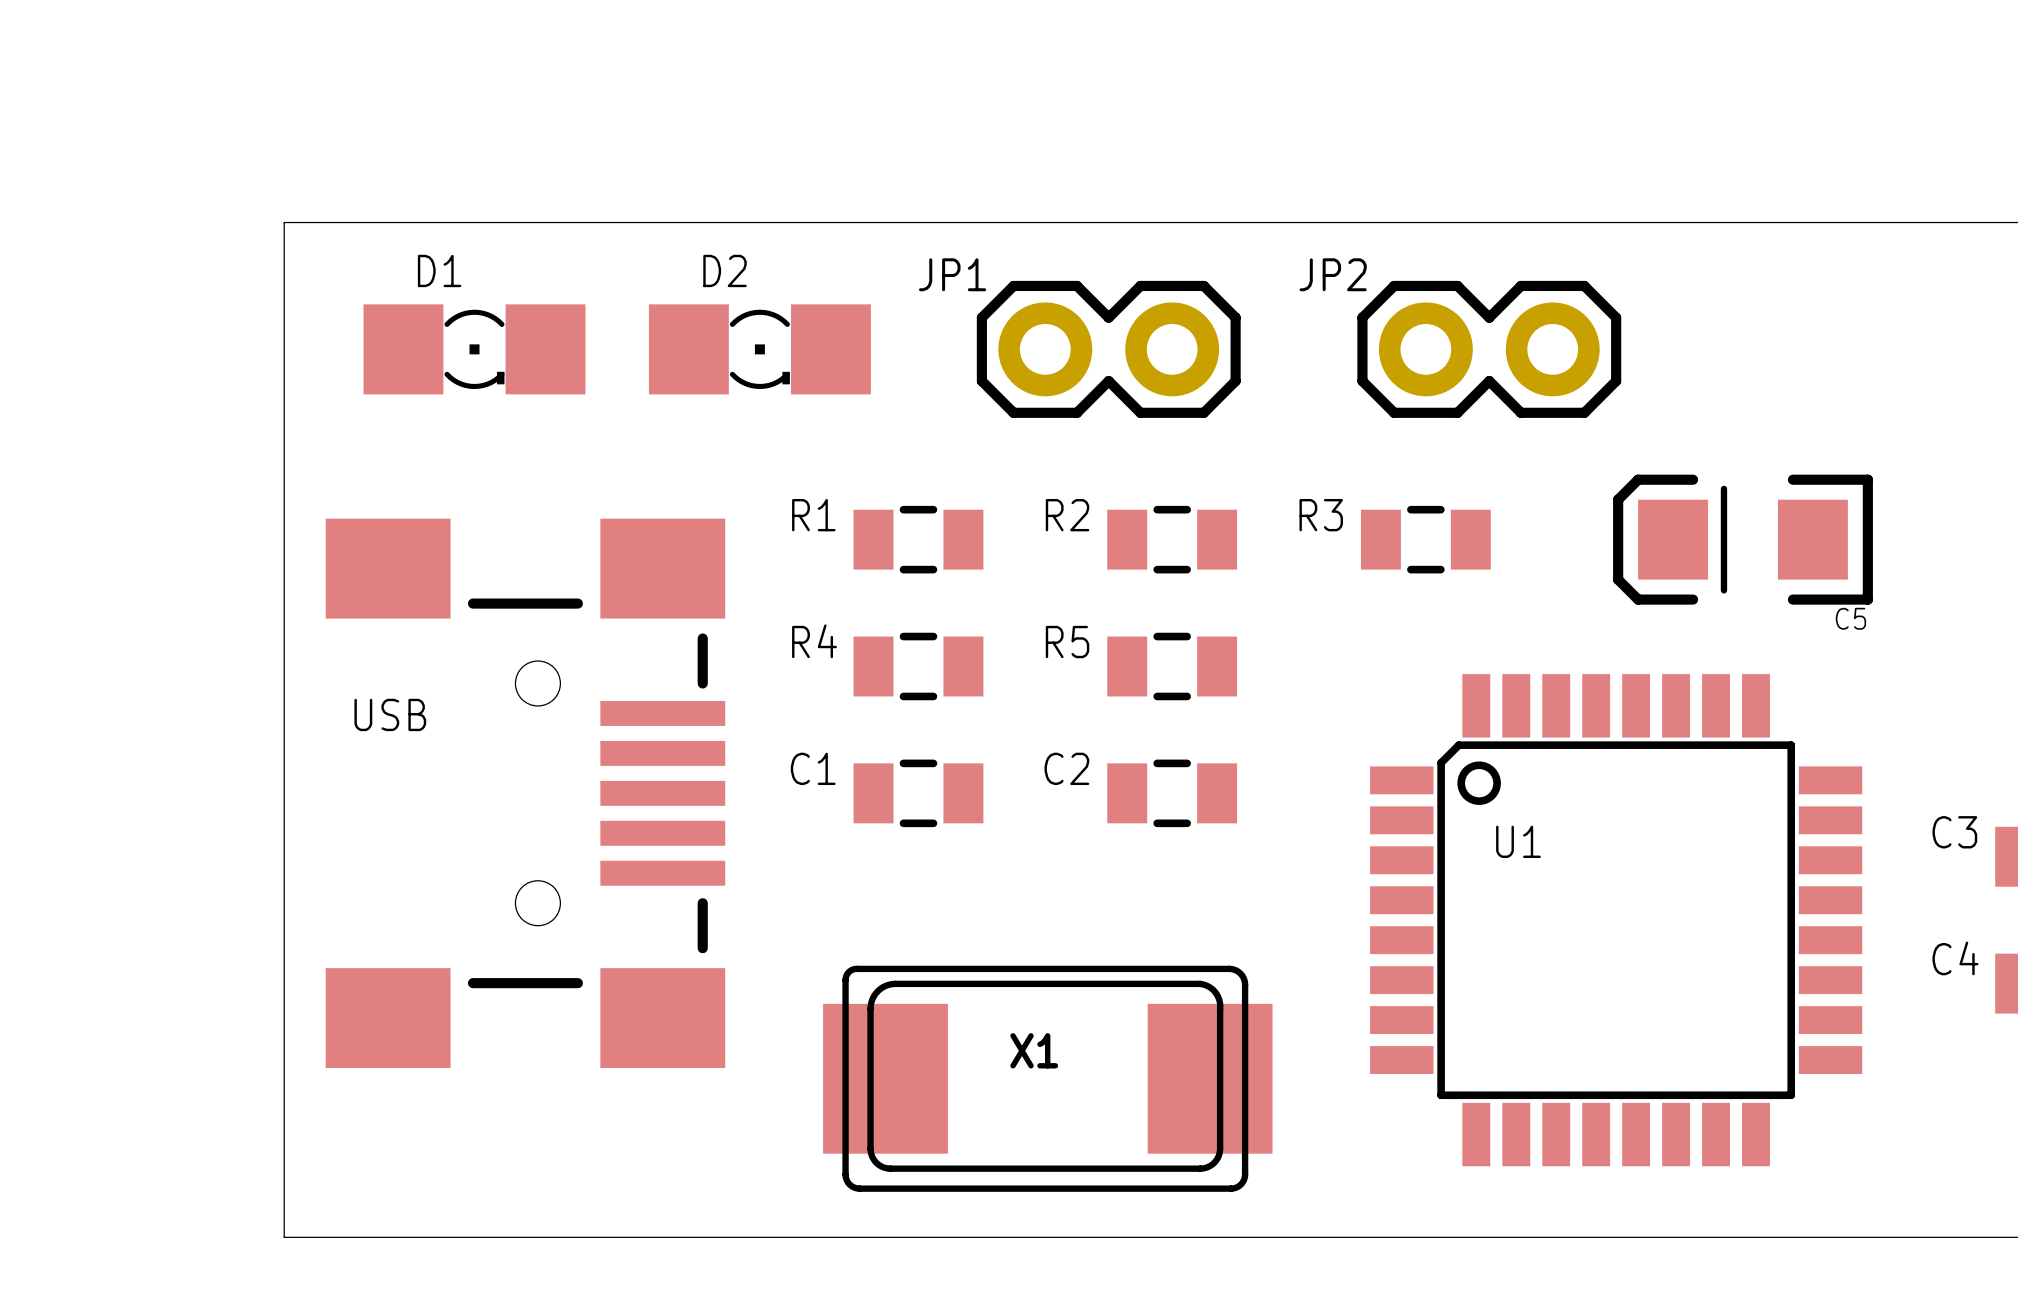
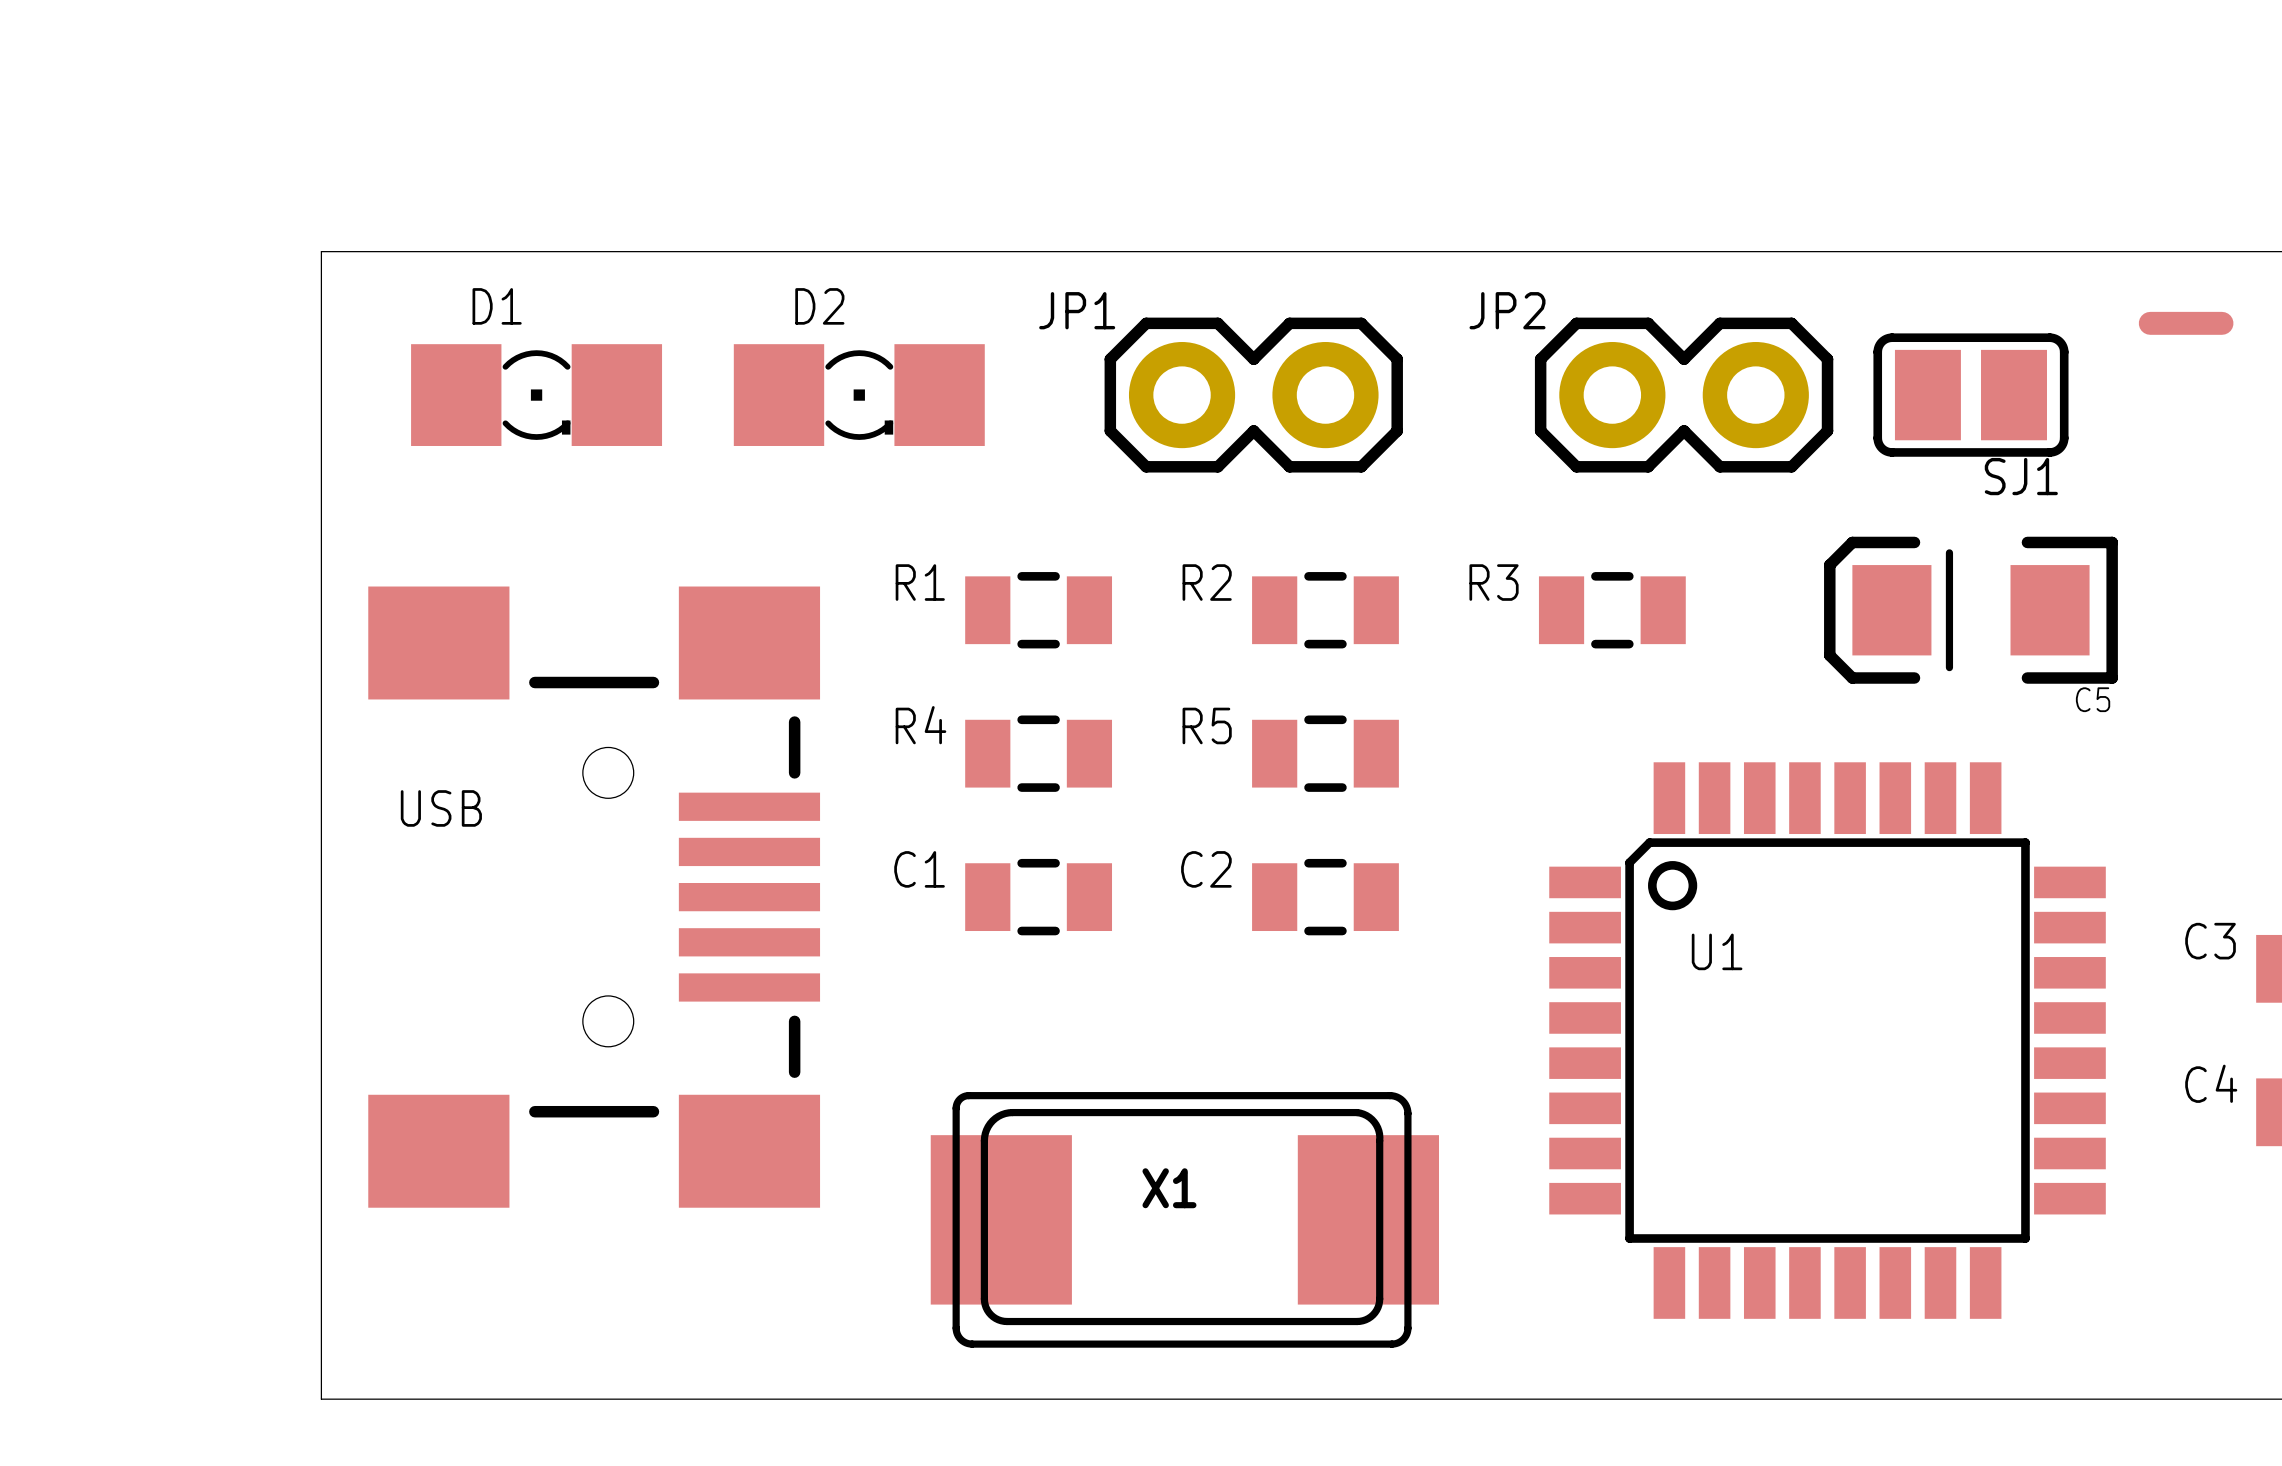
track: none -> (2150, 323) (2221, 323)
SJ1: none -> (1970, 395)

